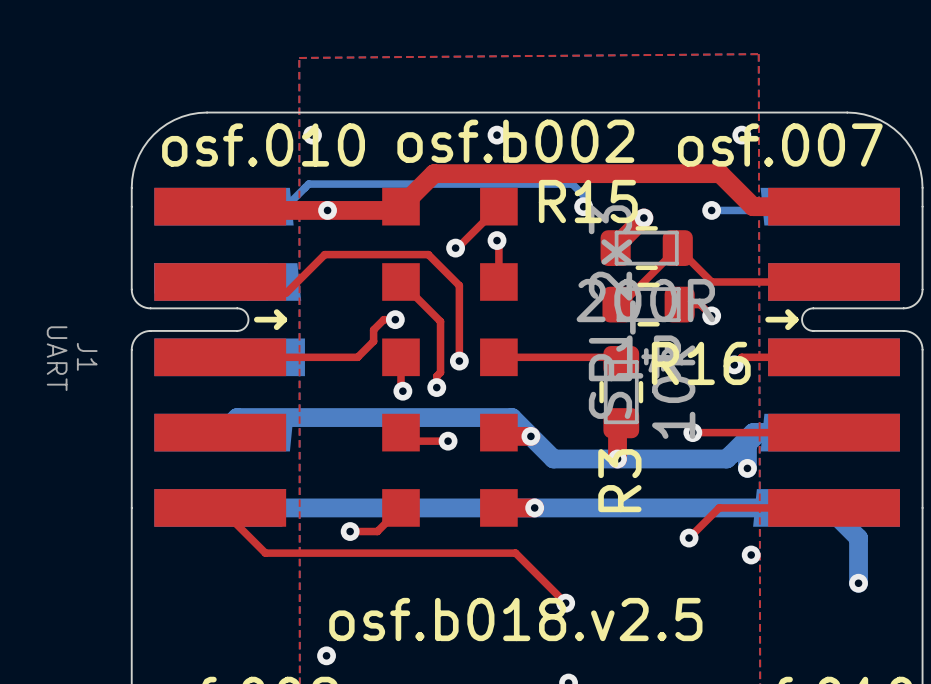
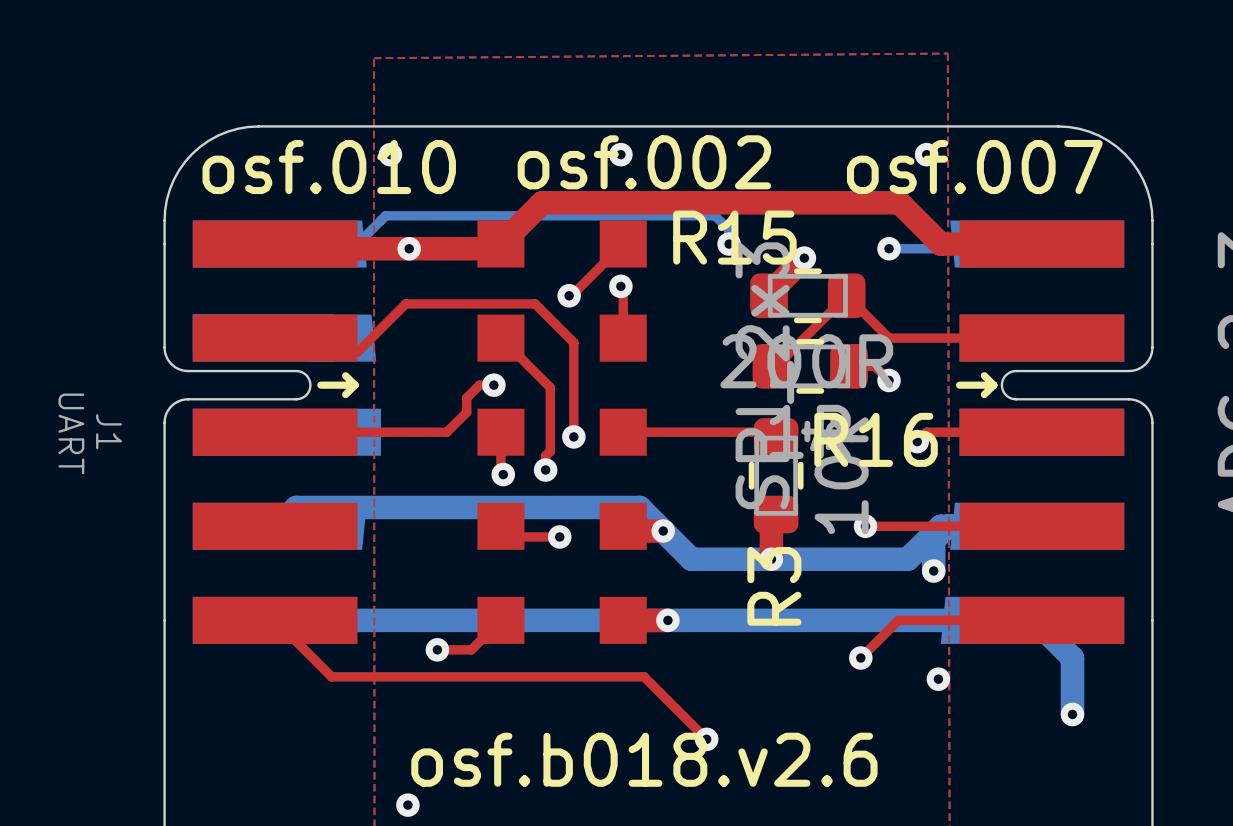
text: osf.b002 (515, 141) -> osf.002 (644, 162)
text: osf.b018.v2.5 (515, 619) -> osf.b018.v2.6 (644, 759)

